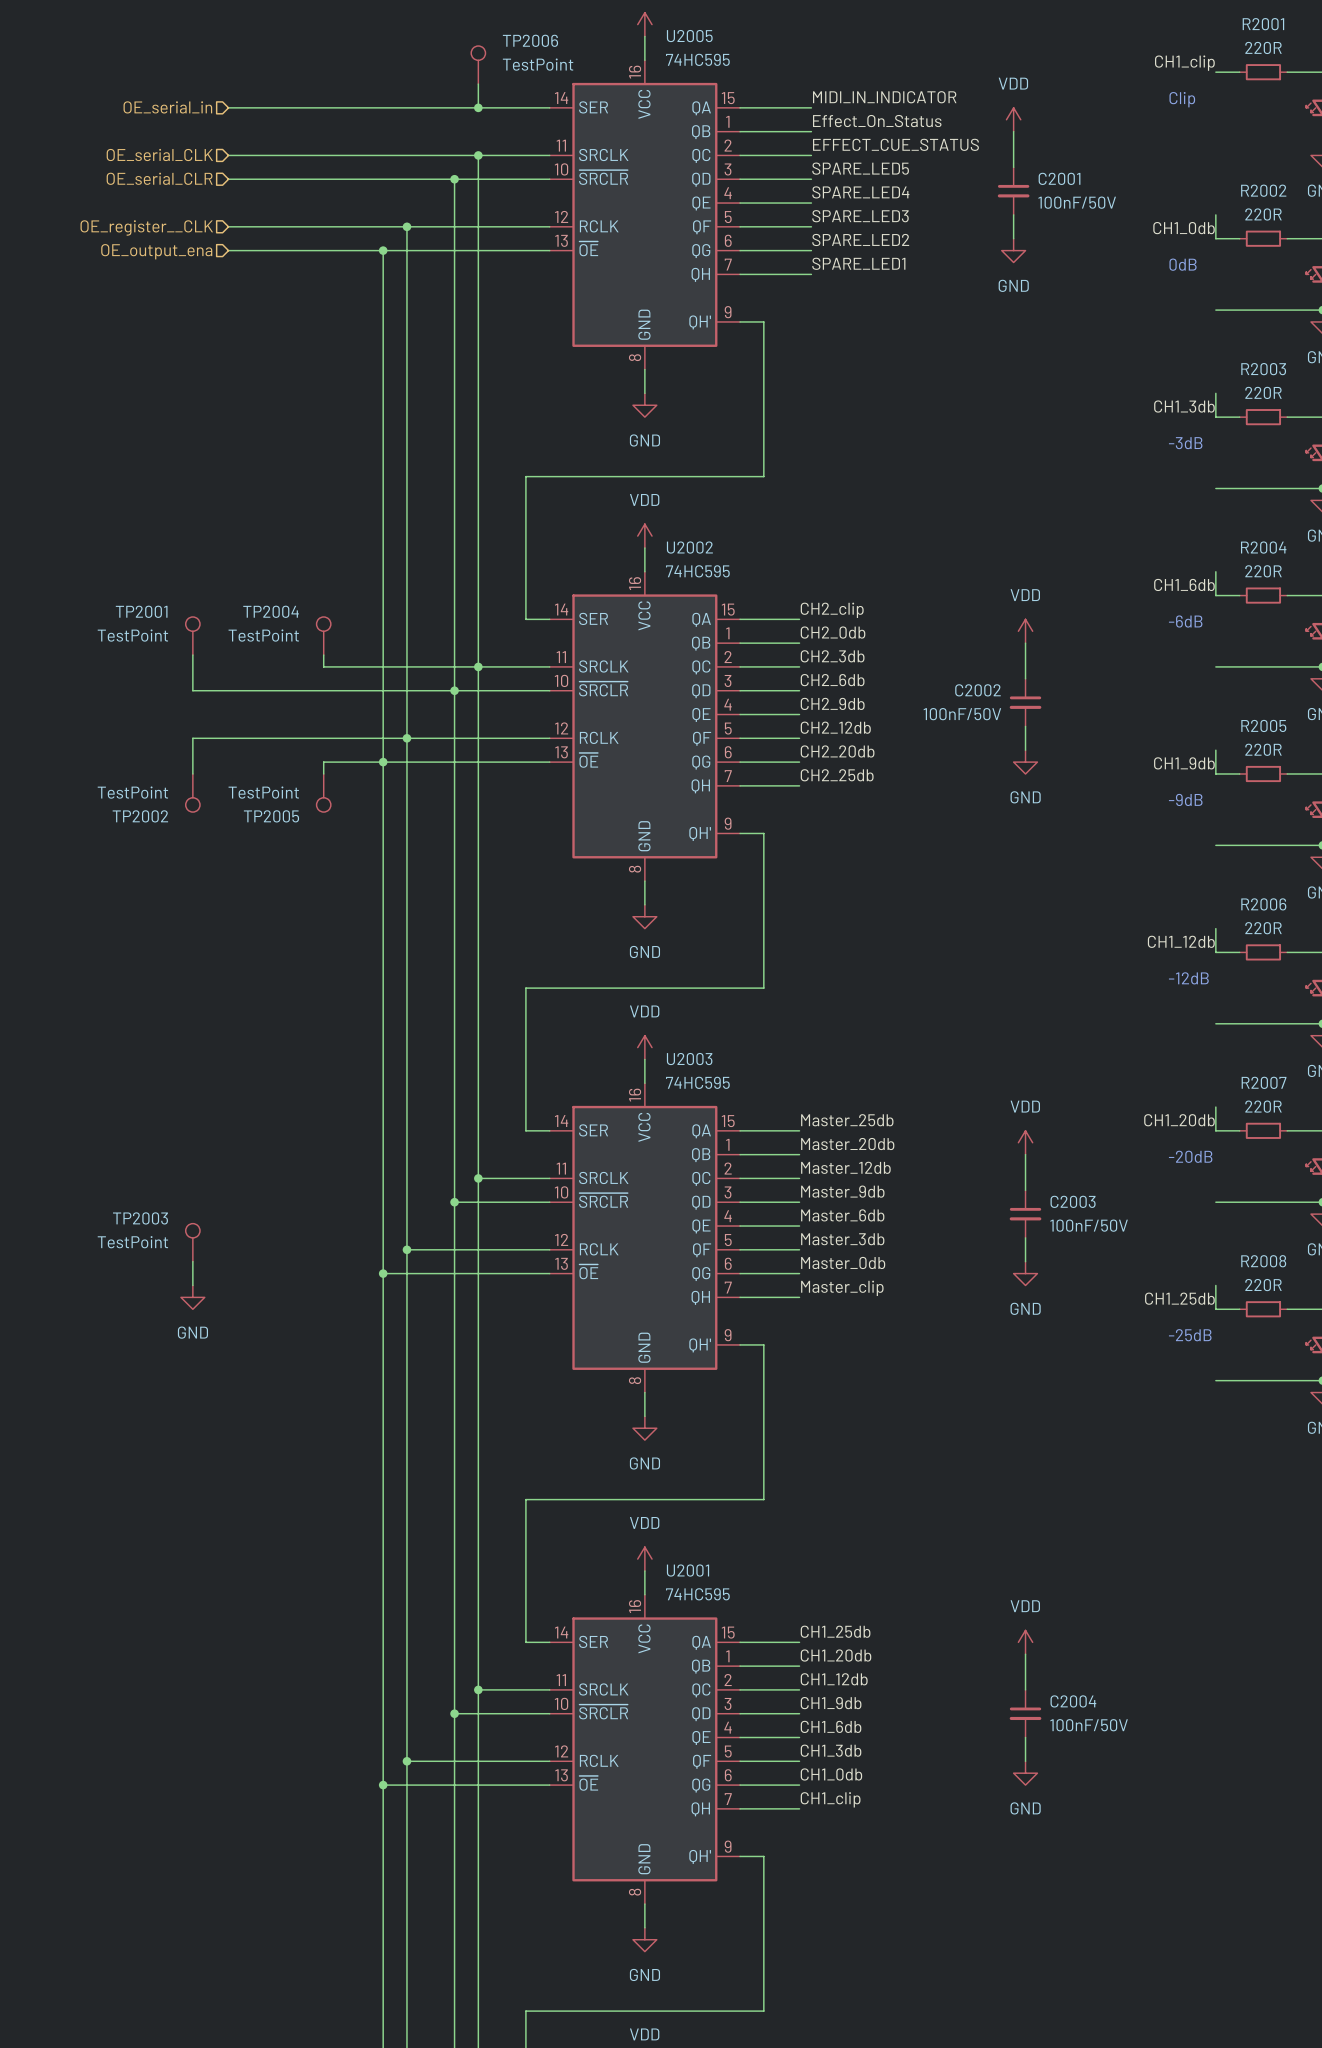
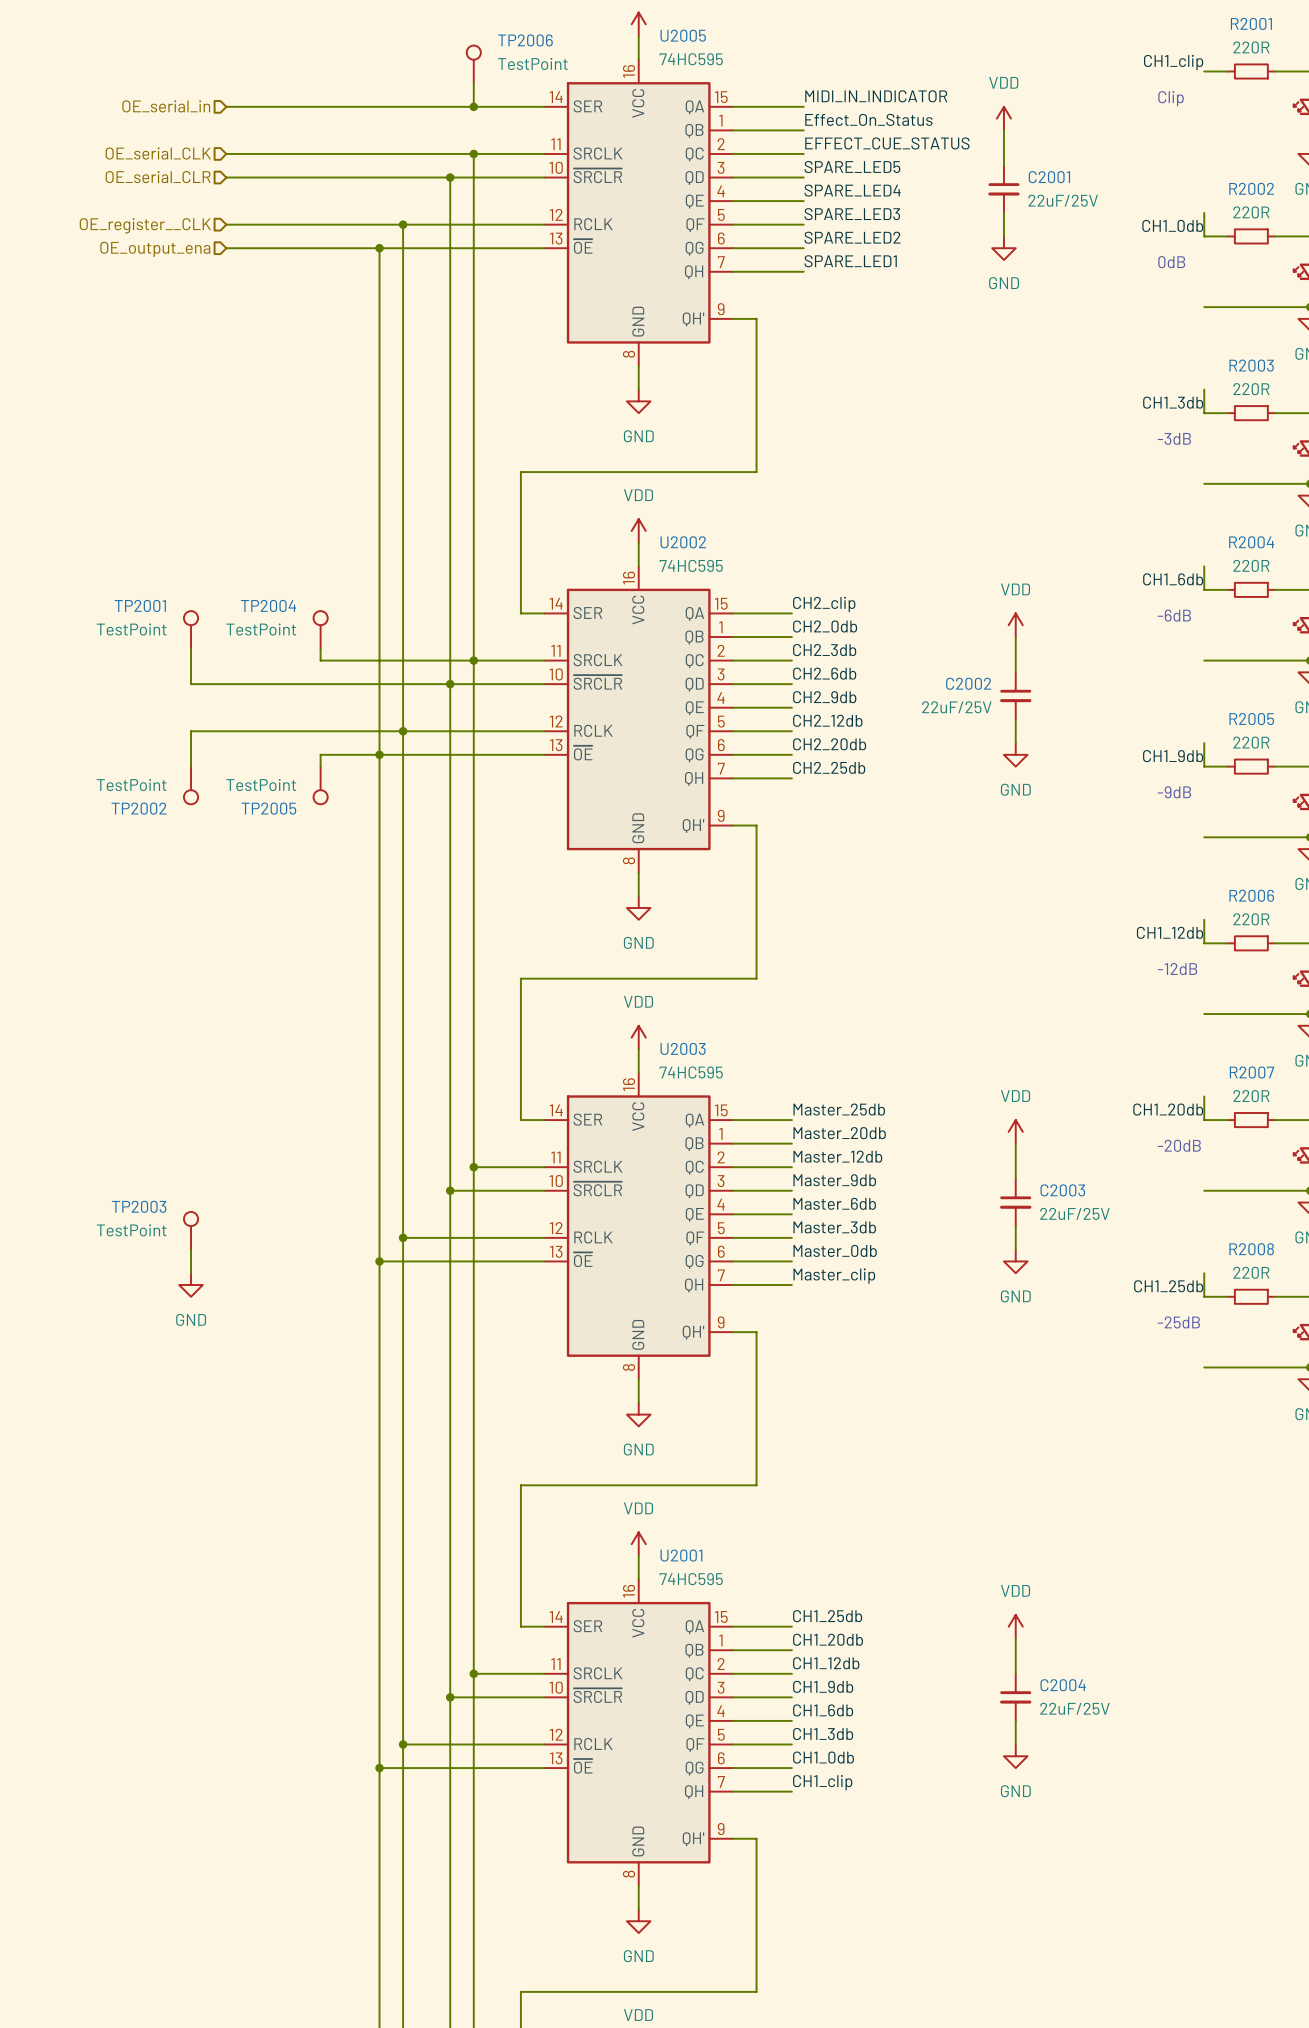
C2001 value: 100nF/50V (1077, 202) -> 22uF/25V (1063, 200)
C2002 value: 100nF/50V (962, 714) -> 22uF/25V (956, 707)
C2003 value: 100nF/50V (1089, 1225) -> 22uF/25V (1074, 1213)
C2004 value: 100nF/50V (1089, 1725) -> 22uF/25V (1074, 1708)

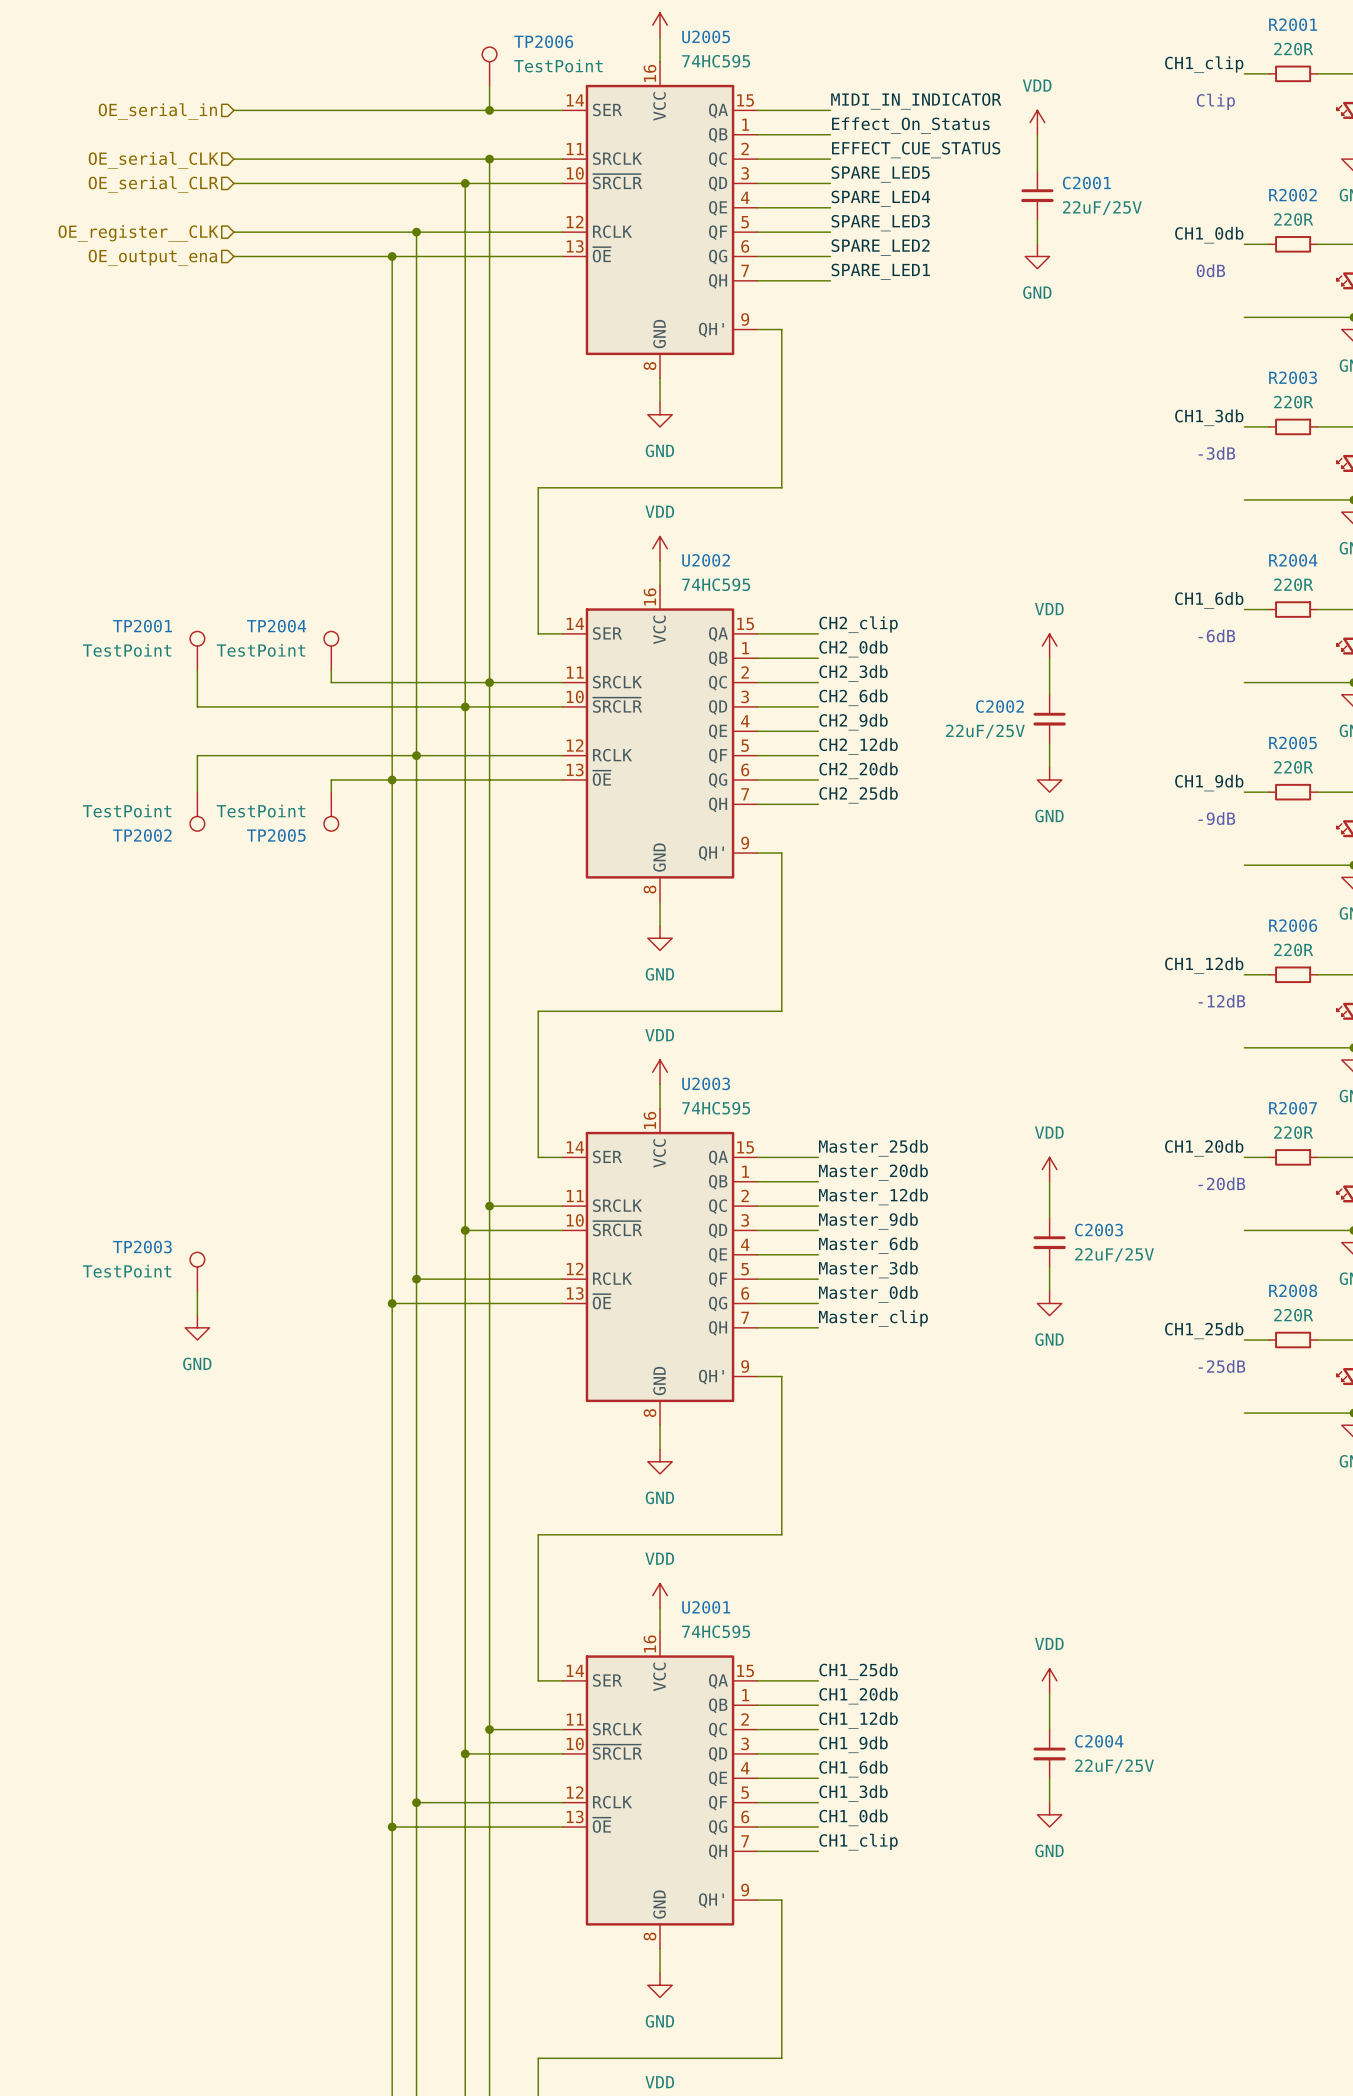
wire: (1204, 212) (1204, 236) -> none
wire: (1204, 389) (1204, 413) -> none
wire: (1204, 566) (1204, 589) -> none
wire: (1204, 743) (1204, 766) -> none
wire: (1204, 919) (1204, 943) -> none
wire: (1204, 1096) (1204, 1120) -> none
wire: (1204, 1273) (1204, 1296) -> none

